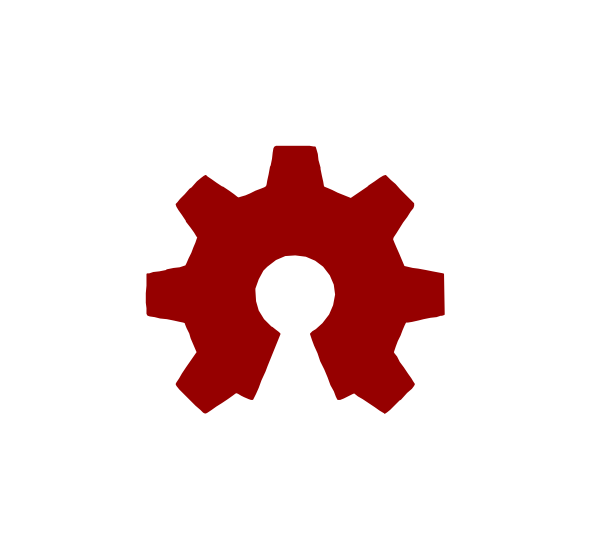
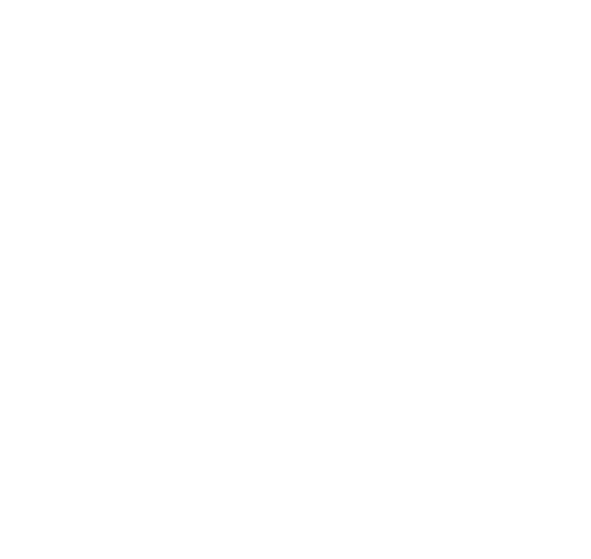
part: (295, 279) -> none

